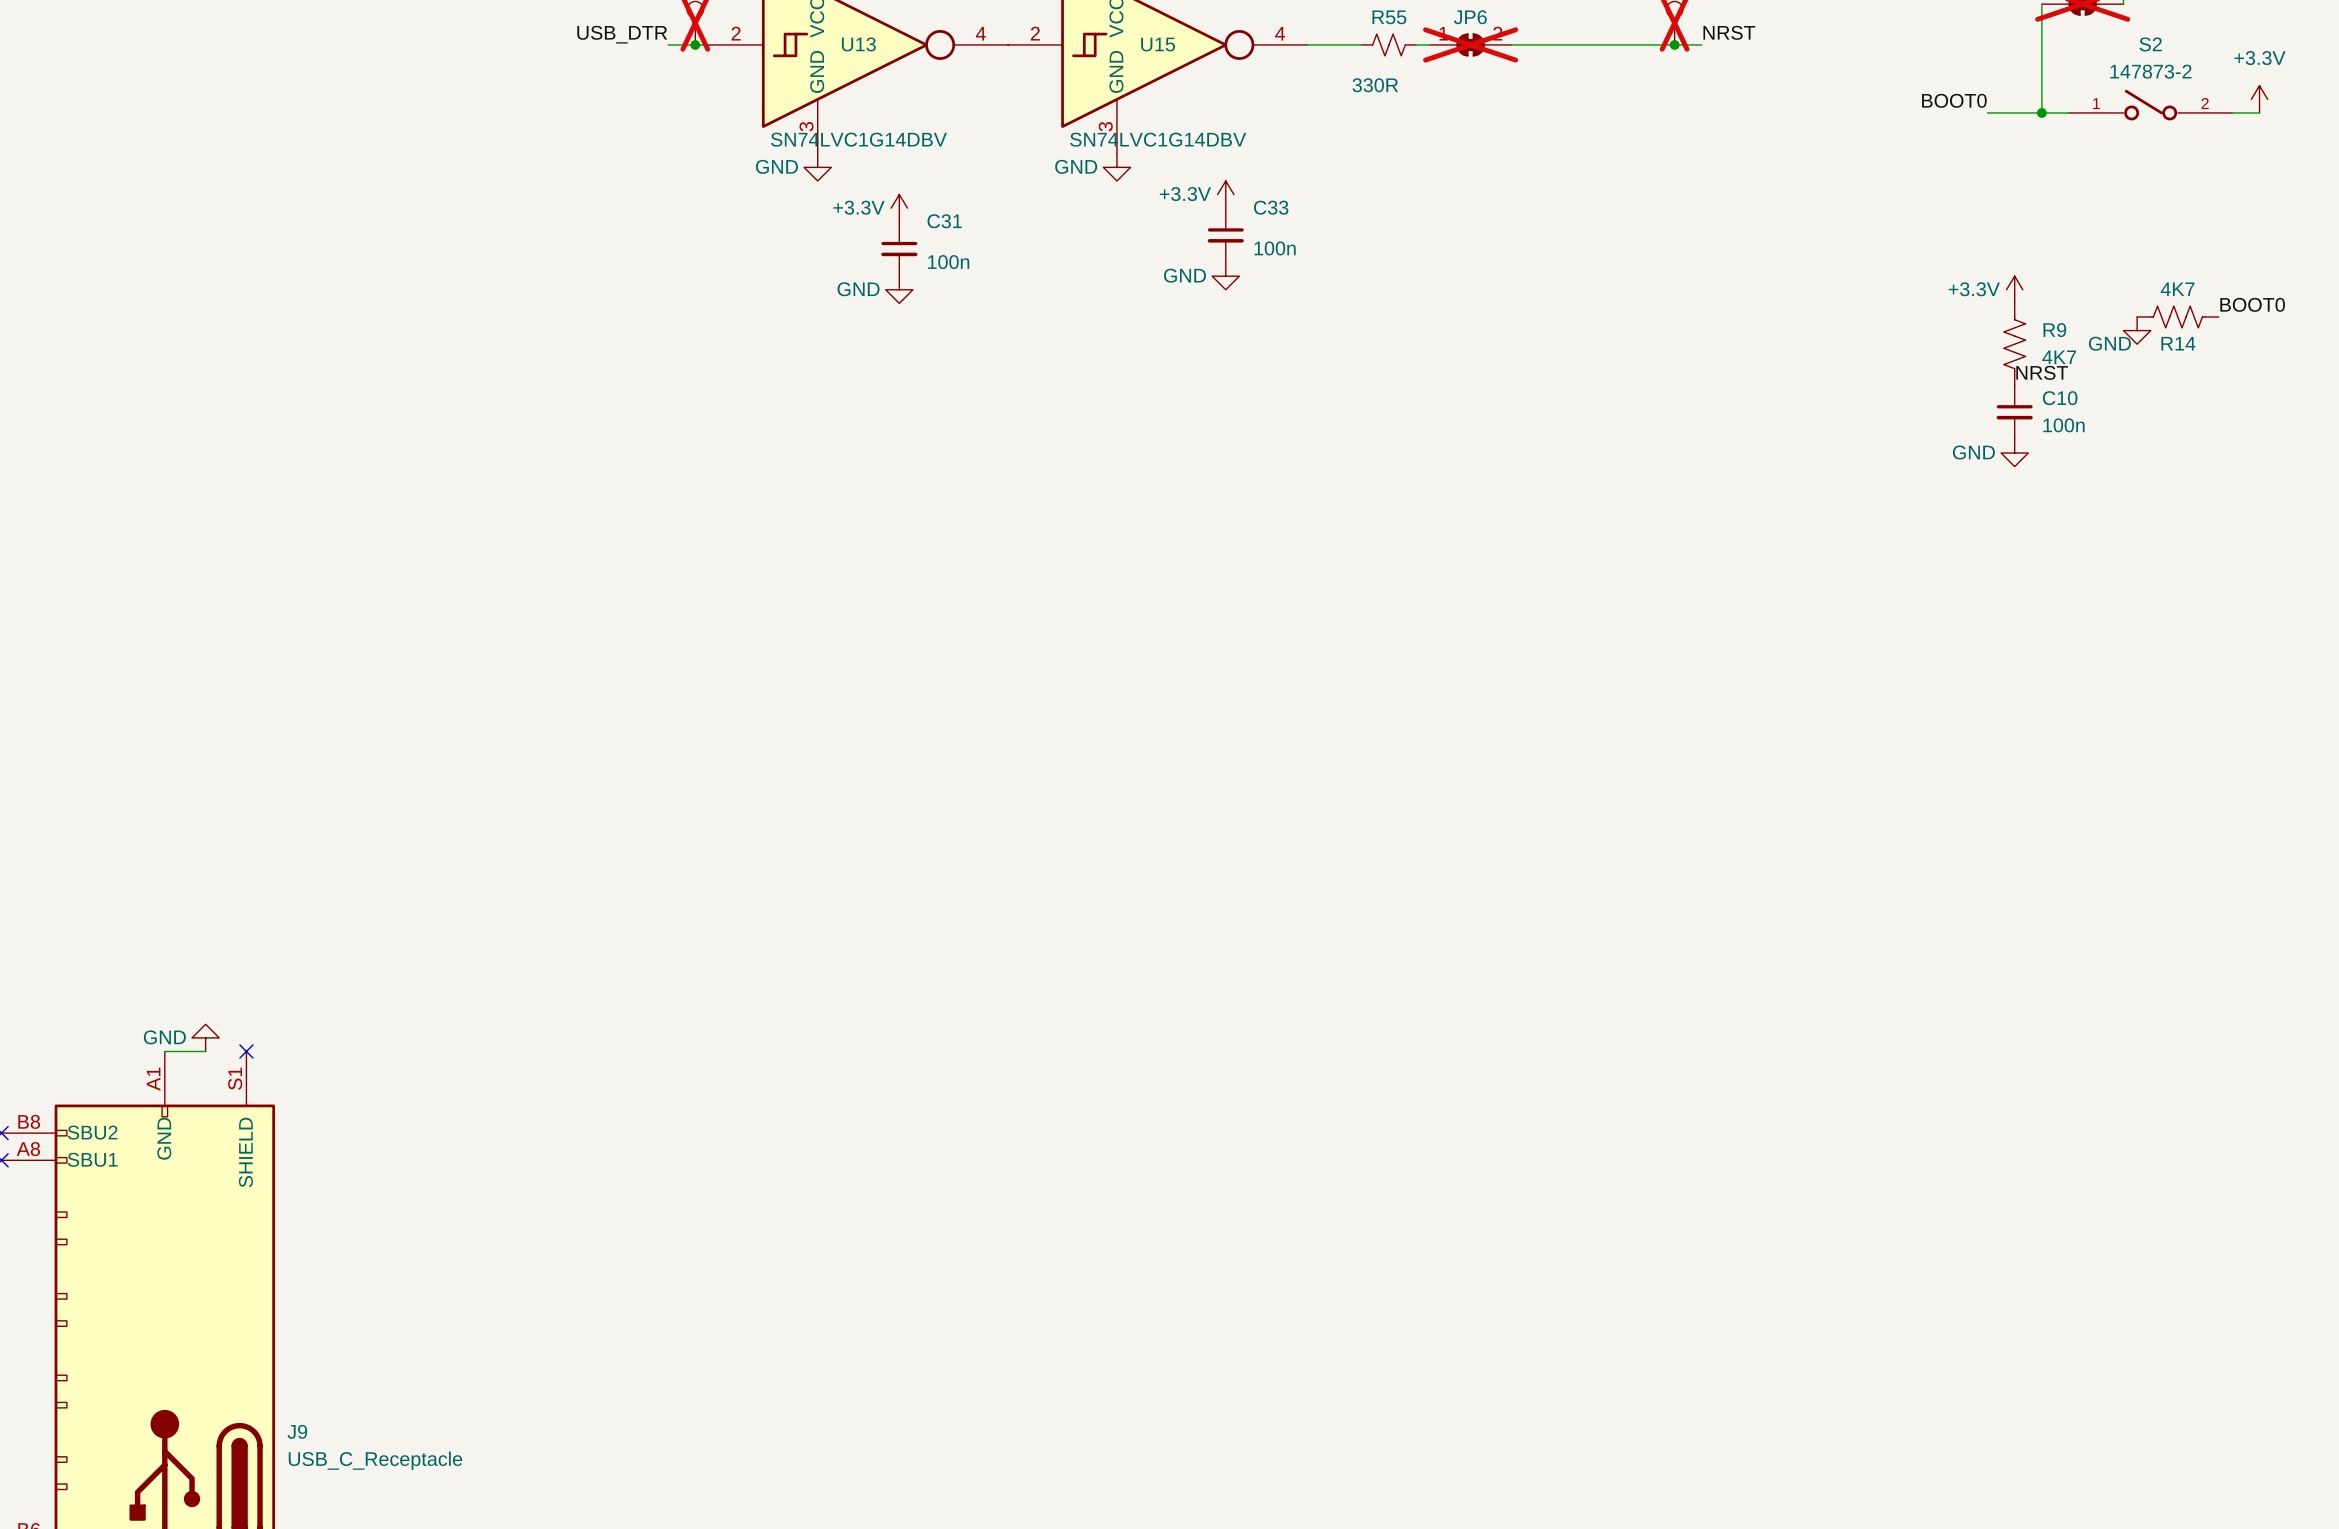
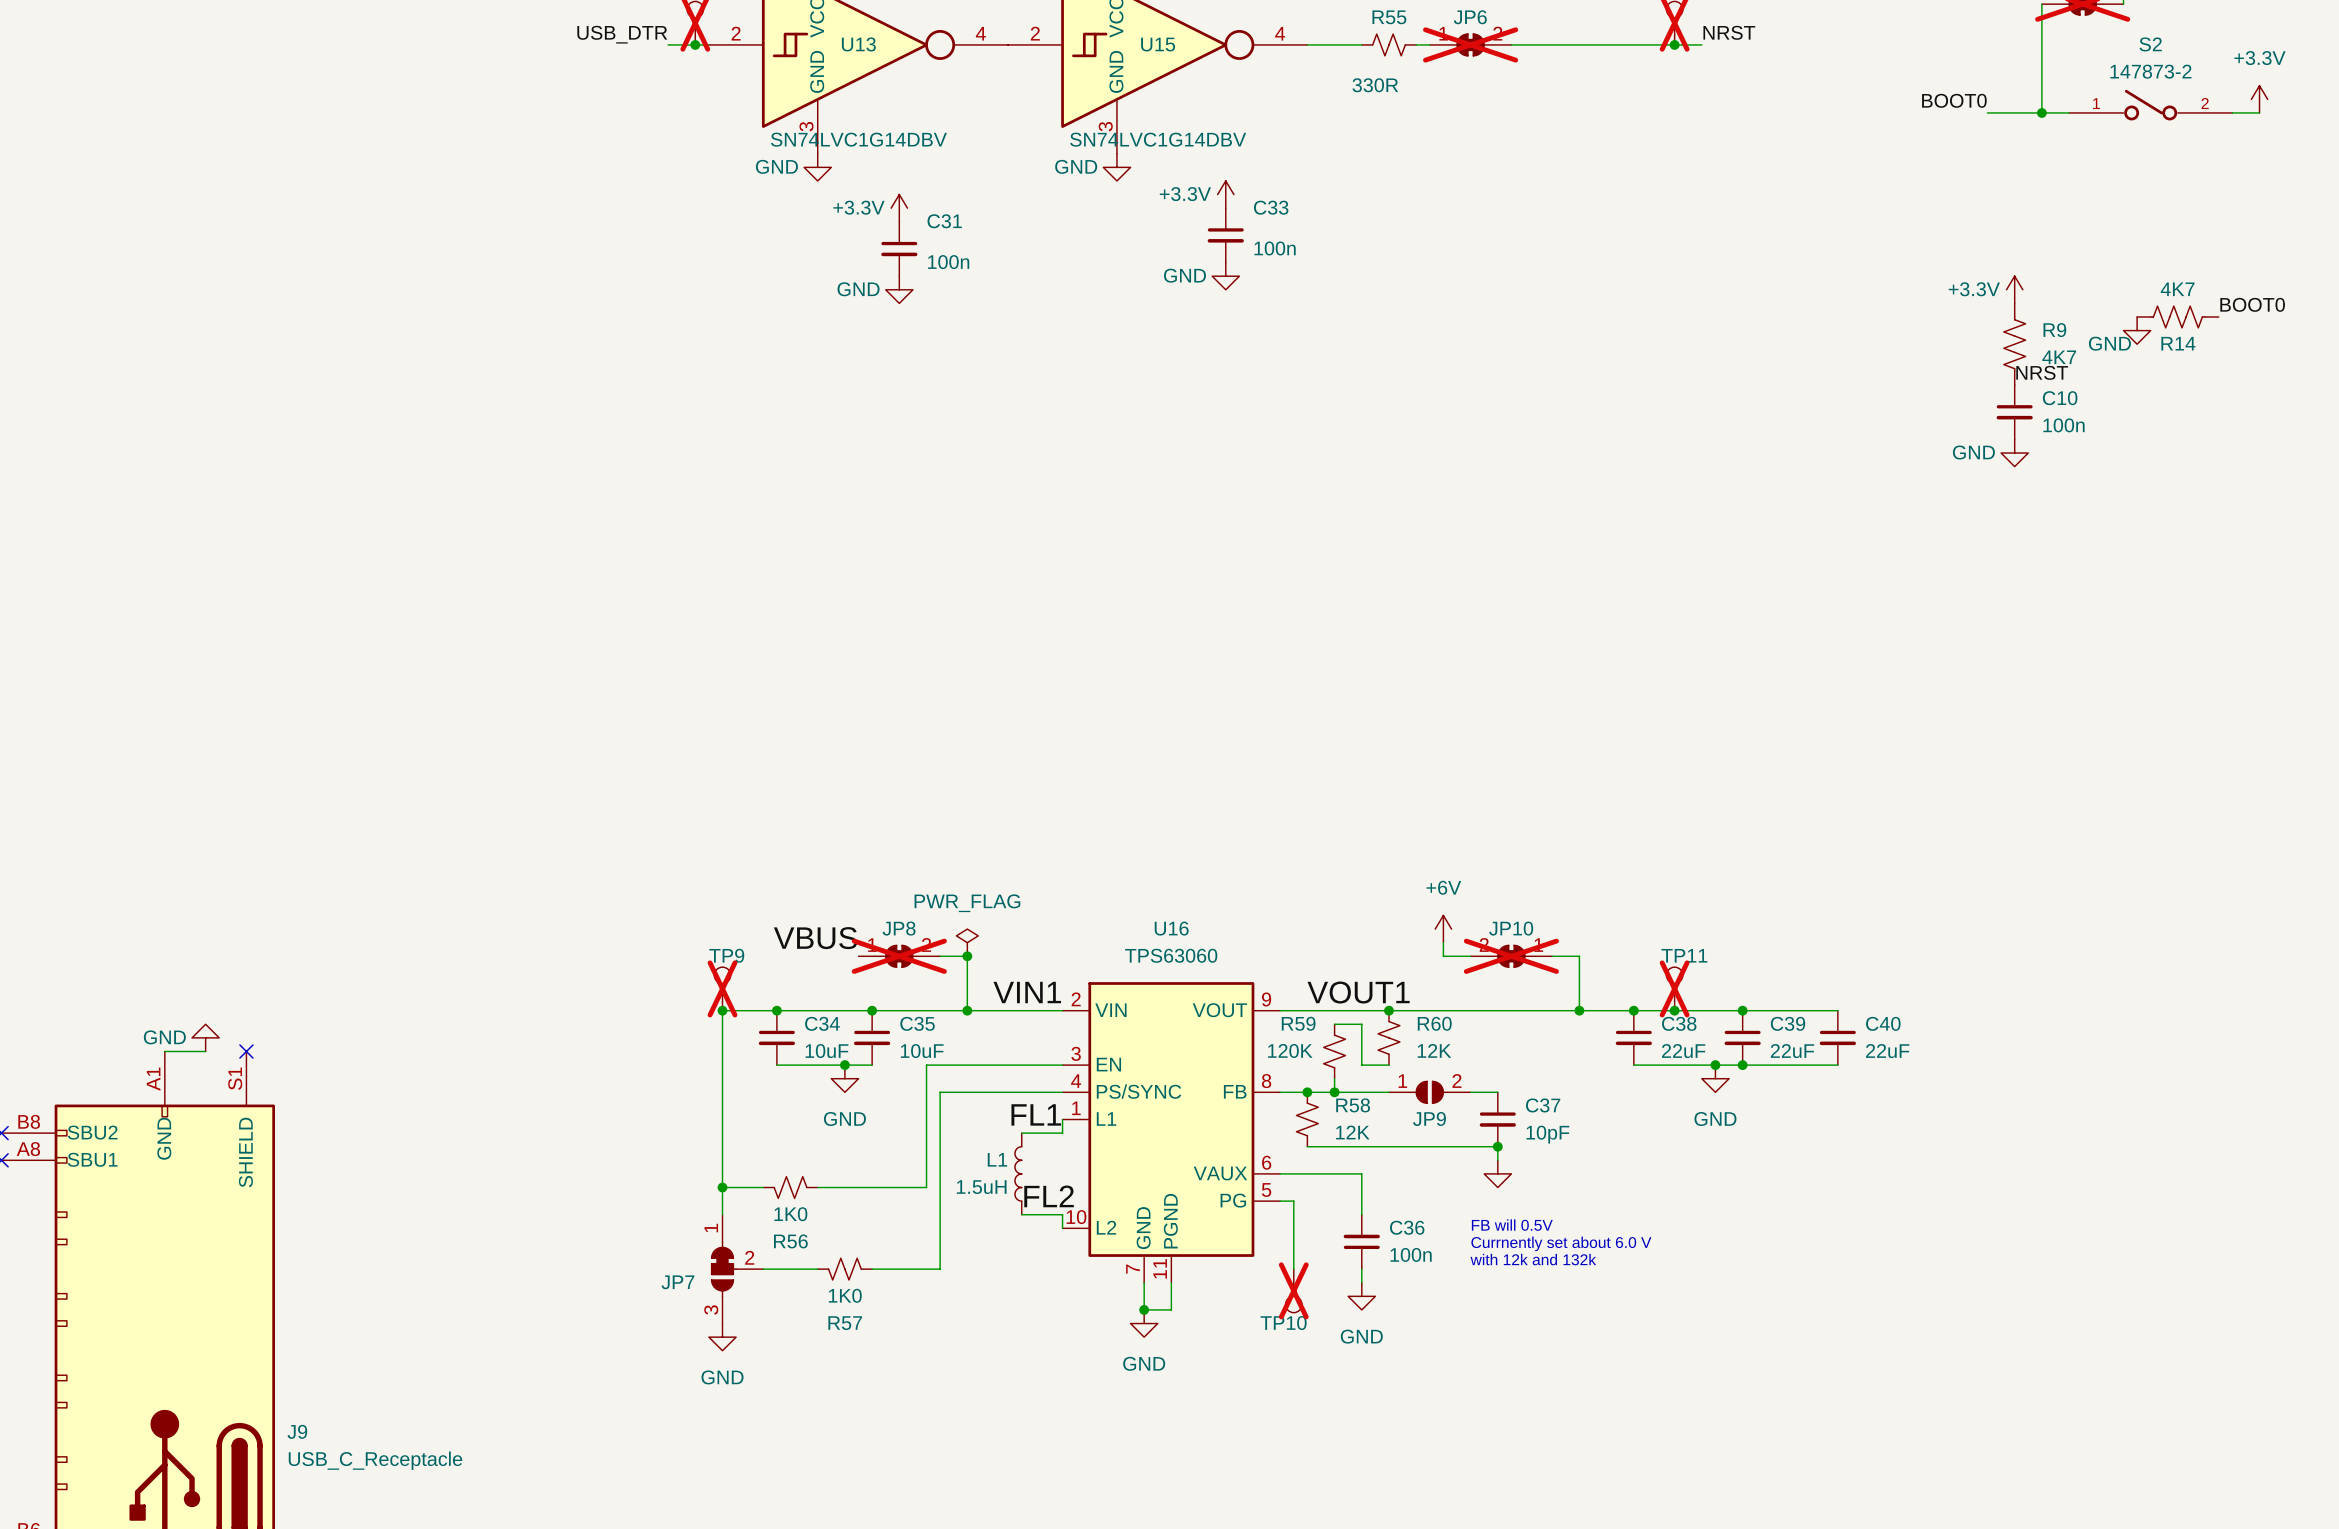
power symbol: none -> +6V (1443, 929)
label: none -> VBUS (815, 938)
power symbol: none -> PWR_FLAG (967, 942)
wire: none -> (1443, 942) (1443, 956) (1470, 956)
JP8: none -> (899, 956)
wire: none -> (940, 956) (967, 956) (967, 1010)
junction: none -> (967, 956)
JP10: none -> (1511, 956)
wire: none -> (1552, 956) (1579, 956) (1579, 1010)
TP9: none -> (722, 988)
TP11: none -> (1674, 988)
label: none -> VIN1 (1027, 992)
label: none -> VOUT1 (1358, 992)
junction: none -> (722, 1010)
junction: none -> (776, 1010)
junction: none -> (872, 1010)
junction: none -> (967, 1010)
wire: none -> (1062, 1010) (722, 1010) (722, 1214)
wire: none -> (1280, 1010) (1837, 1010)
junction: none -> (1388, 1010)
junction: none -> (1579, 1010)
junction: none -> (1633, 1010)
junction: none -> (1674, 1010)
junction: none -> (1742, 1010)
wire: none -> (1334, 1024) (1361, 1024) (1361, 1065) (1388, 1065)
C34: none -> 10uF (776, 1037)
C35: none -> 10uF (872, 1037)
R60: none -> 12K (1388, 1037)
C38: none -> 22uF (1633, 1037)
C39: none -> 22uF (1742, 1037)
C40: none -> 22uF (1837, 1037)
R59: none -> 120K (1334, 1051)
wire: none -> (776, 1065) (872, 1065)
junction: none -> (844, 1065)
wire: none -> (1062, 1065) (926, 1065) (926, 1187) (817, 1187)
wire: none -> (1633, 1065) (1837, 1065)
junction: none -> (1715, 1065)
junction: none -> (1742, 1065)
power symbol: none -> GND (844, 1078)
wire: none -> (1334, 1078) (1334, 1092)
power symbol: none -> GND (1715, 1078)
wire: none -> (1062, 1092) (940, 1092) (940, 1269) (872, 1269)
wire: none -> (1280, 1092) (1388, 1092)
junction: none -> (1307, 1092)
junction: none -> (1334, 1092)
JP9: none -> (1429, 1092)
wire: none -> (1470, 1092) (1497, 1092)
label: none -> FL1 (1036, 1114)
wire: none -> (1062, 1119) (1062, 1133) (1021, 1133)
R58: none -> 12K (1307, 1119)
C37: none -> 10pF (1497, 1119)
U16: none -> TPS63060 (1171, 1132)
wire: none -> (1307, 1146) (1497, 1146) (1497, 1160)
junction: none -> (1497, 1146)
L1: none -> 1.5uH (1018, 1173)
wire: none -> (1280, 1173) (1361, 1173) (1361, 1214)
power symbol: none -> (1497, 1173)
wire: none -> (722, 1187) (763, 1187)
junction: none -> (722, 1187)
R56: none -> 1K0 (790, 1187)
label: none -> FL2 (1049, 1196)
wire: none -> (1280, 1201) (1293, 1201) (1293, 1269)
wire: none -> (1021, 1214) (1062, 1214) (1062, 1228)
text: none -> FB will 0.5V (1512, 1225)
C36: none -> 100n (1361, 1241)
text: none -> Currnently set about 6.0 V (1561, 1243)
text: none -> with 12k and 132k (1533, 1259)
JP7: none -> (737, 1269)
wire: none -> (763, 1269) (817, 1269)
R57: none -> 1K0 (844, 1269)
wire: none -> (1361, 1269) (1361, 1282)
wire: none -> (1144, 1282) (1144, 1309) (1171, 1309) (1171, 1282)
TP10: none -> (1293, 1290)
power symbol: none -> GND (1361, 1296)
junction: none -> (1144, 1309)
power symbol: none -> GND (1144, 1323)
power symbol: none -> GND (722, 1337)

